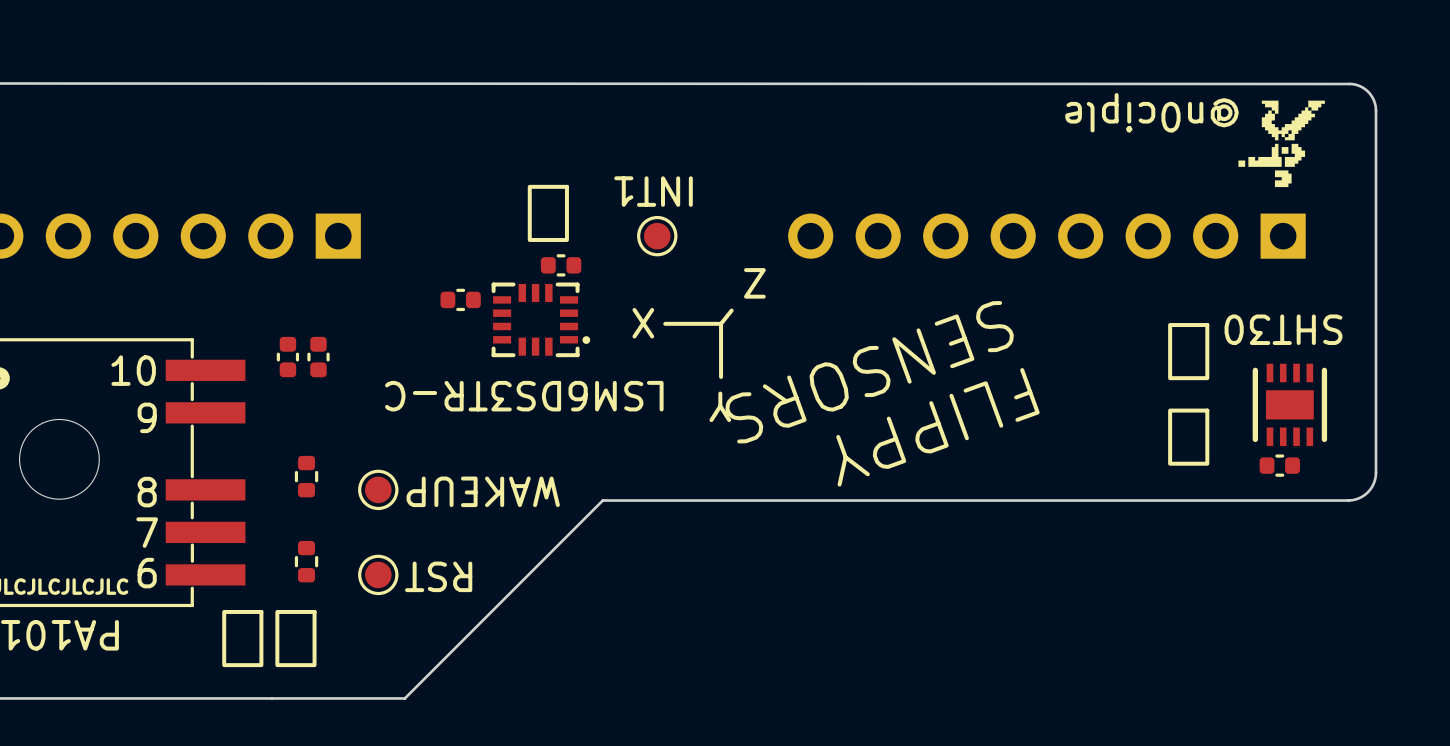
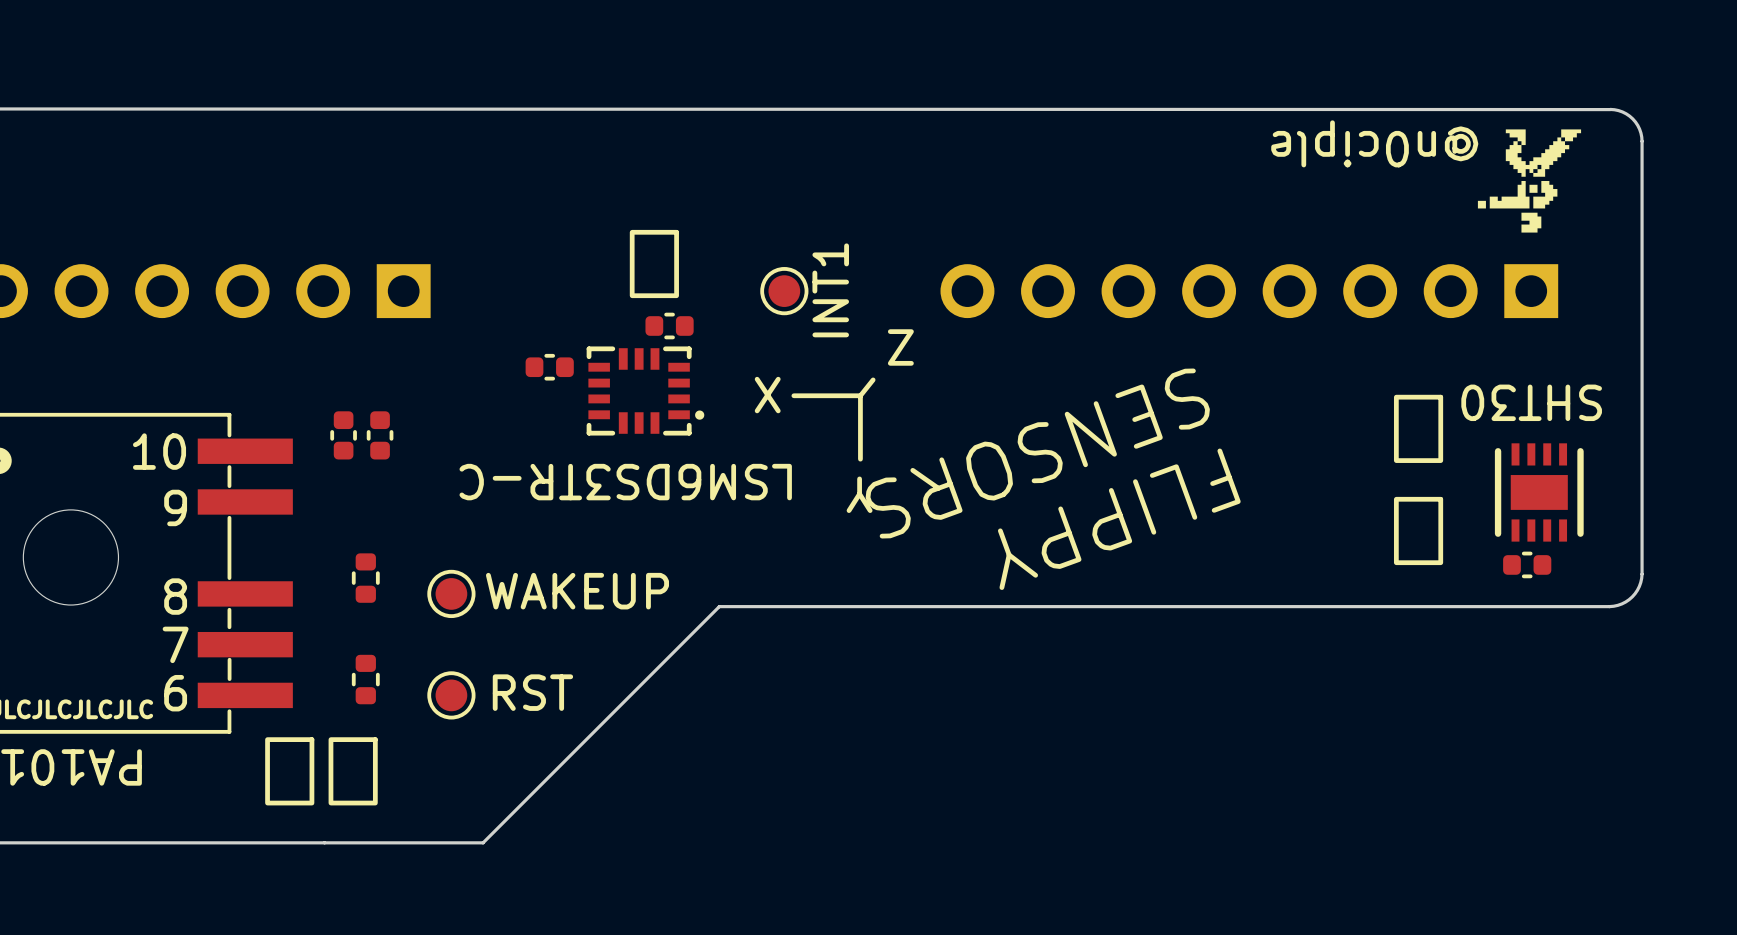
text: INT1 (653, 191) -> none
INT1 name: none -> INT1 (830, 290)
WAKEUP name: none -> WAKEUP (577, 591)
text: WAKEUP (483, 491) -> none
RST name: none -> RST (532, 692)
text: RST (438, 576) -> none

